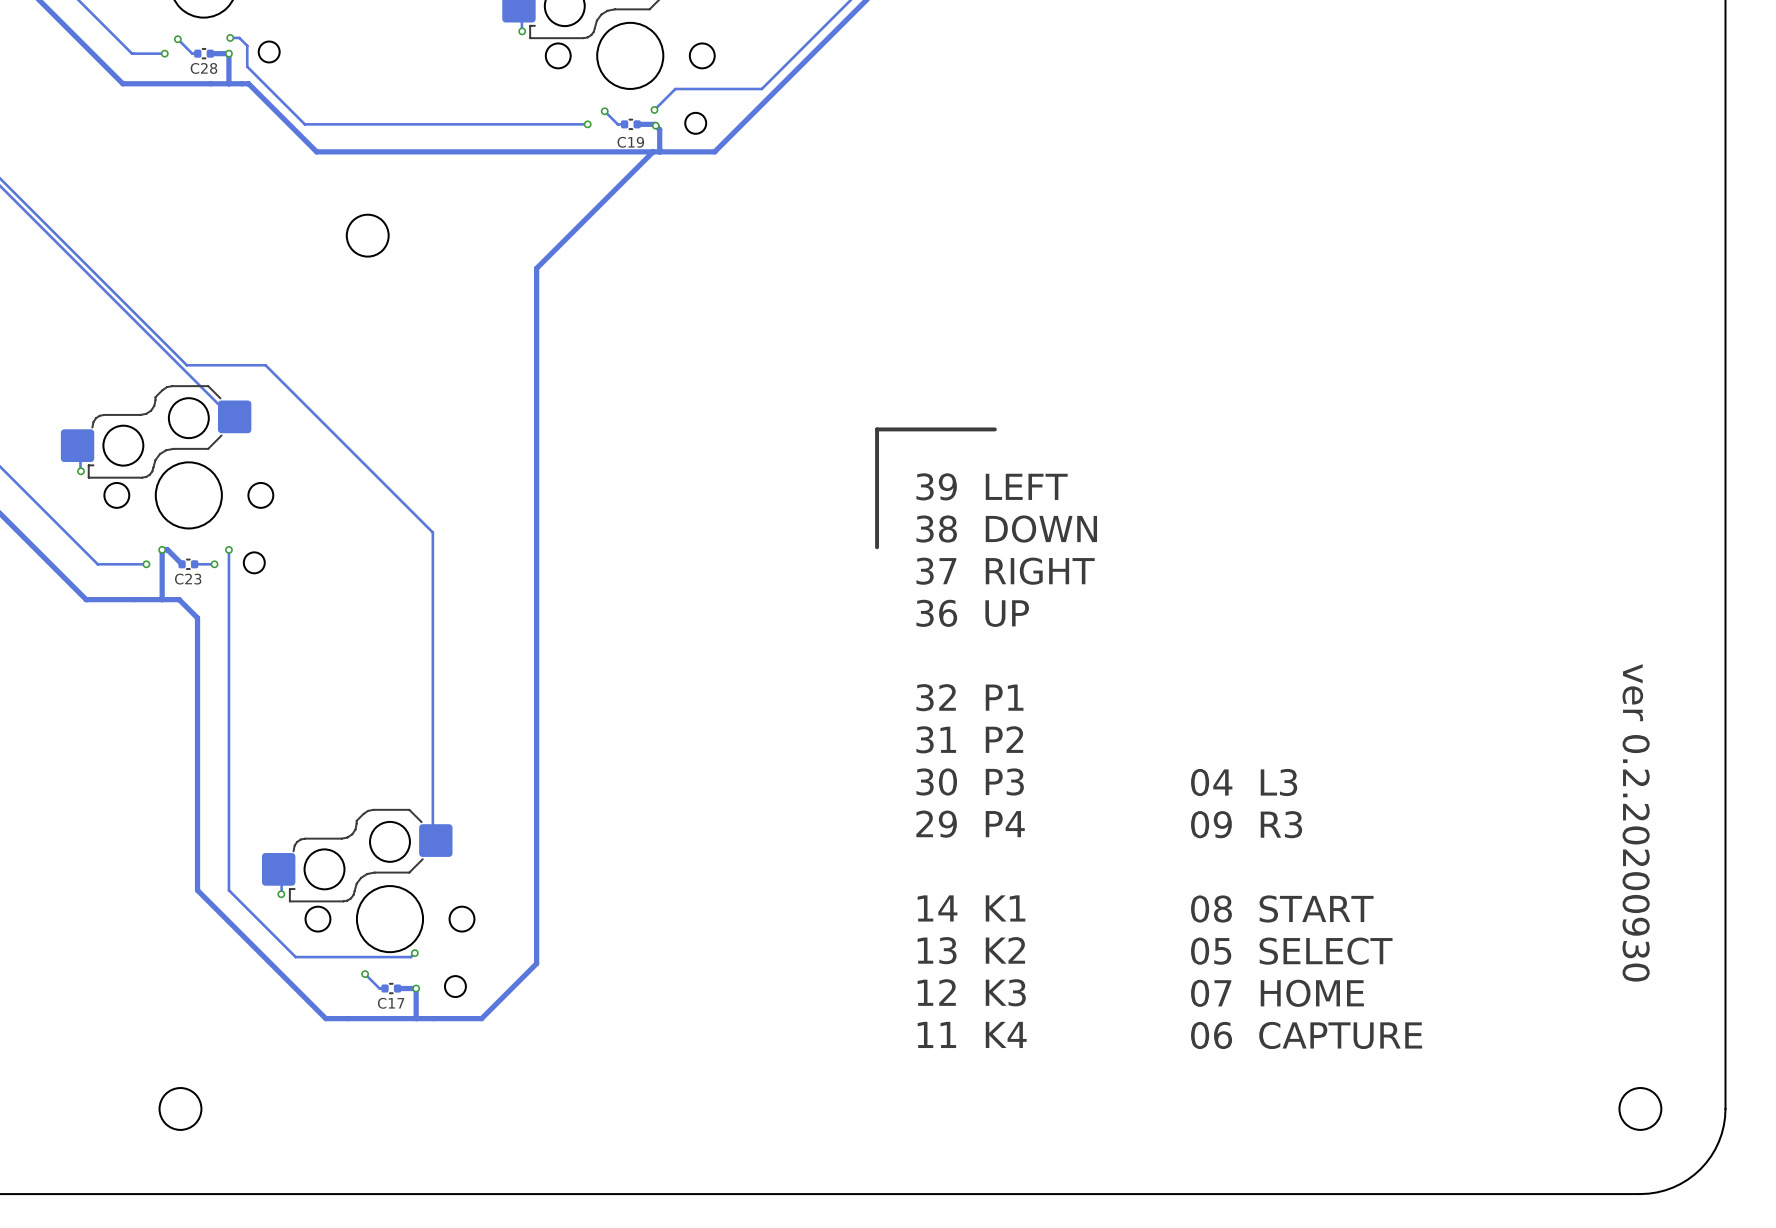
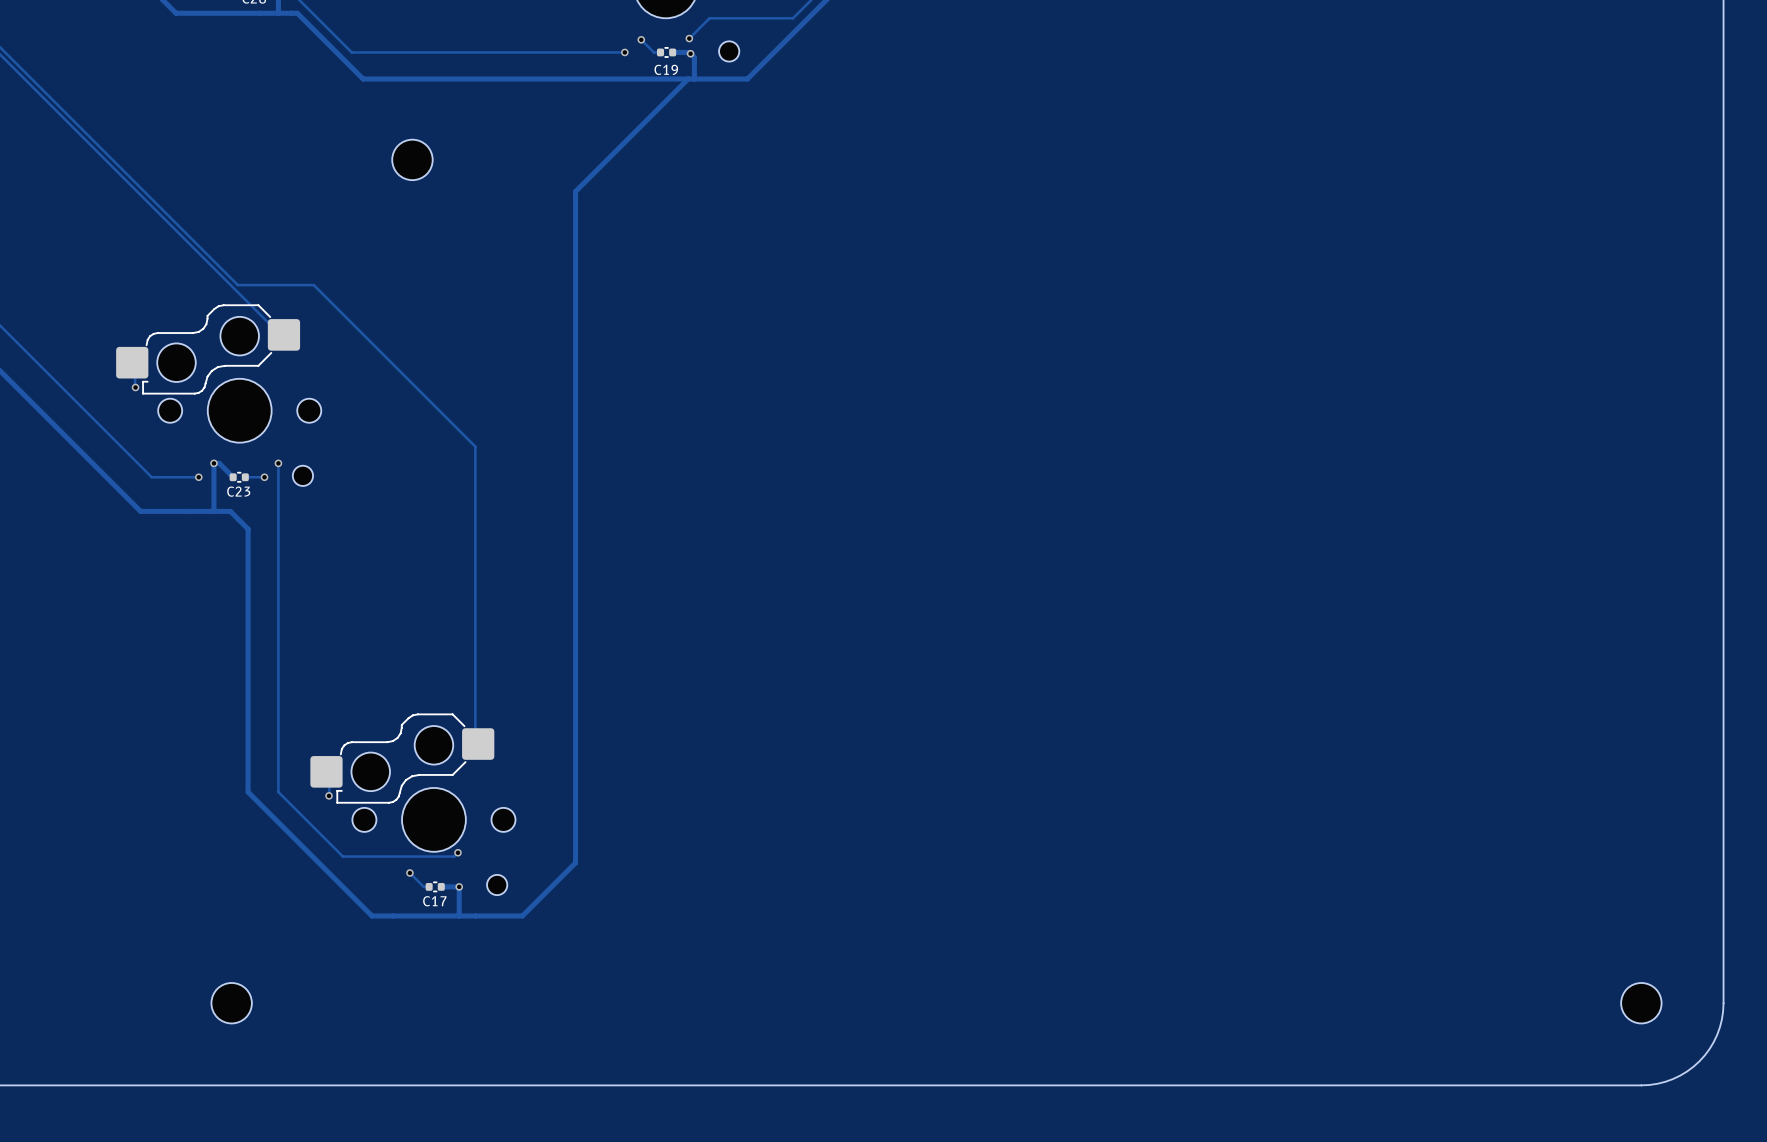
line: (994, 429) (877, 429) (877, 547) -> none
text: 39 LEFT (992, 486) -> none
text: 38 DOWN (1006, 529) -> none
text: 37 RIGHT (1005, 571) -> none
text: 36 UP (972, 613) -> none
text: 32 P1 (969, 697) -> none
text: 31 P2 (969, 739) -> none
text: 30 P3 (970, 781) -> none
text: 04 L3 (1244, 782) -> none
text: ver 0.2.20200930 (1636, 822) -> none
text: 29 P4 (970, 824) -> none
text: 09 R3 (1246, 824) -> none
text: 14 K1 (971, 908) -> none
text: 08 START (1282, 908) -> none
text: 13 K2 (971, 950) -> none
text: 05 SELECT (1291, 951) -> none
text: 12 K3 (971, 992) -> none
text: 07 HOME (1277, 993) -> none
text: 11 K4 (972, 1034) -> none
text: 06 CAPTURE (1306, 1035) -> none

